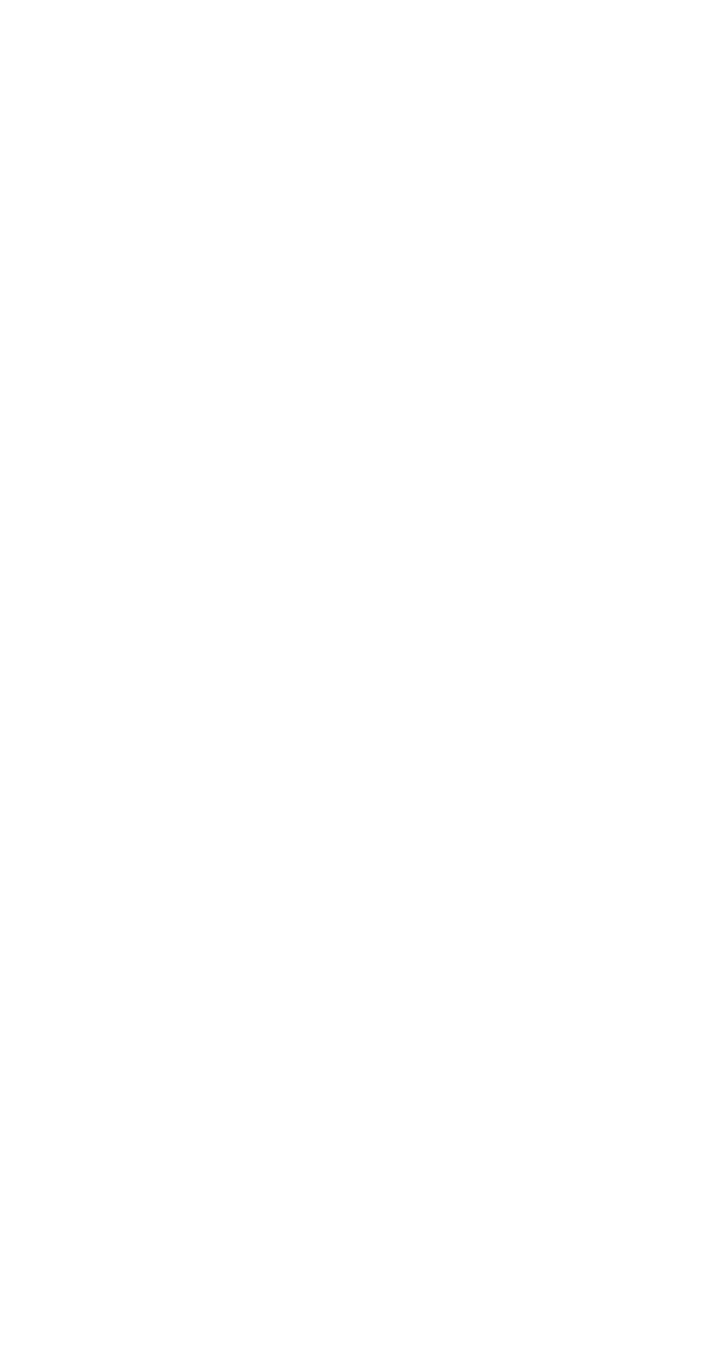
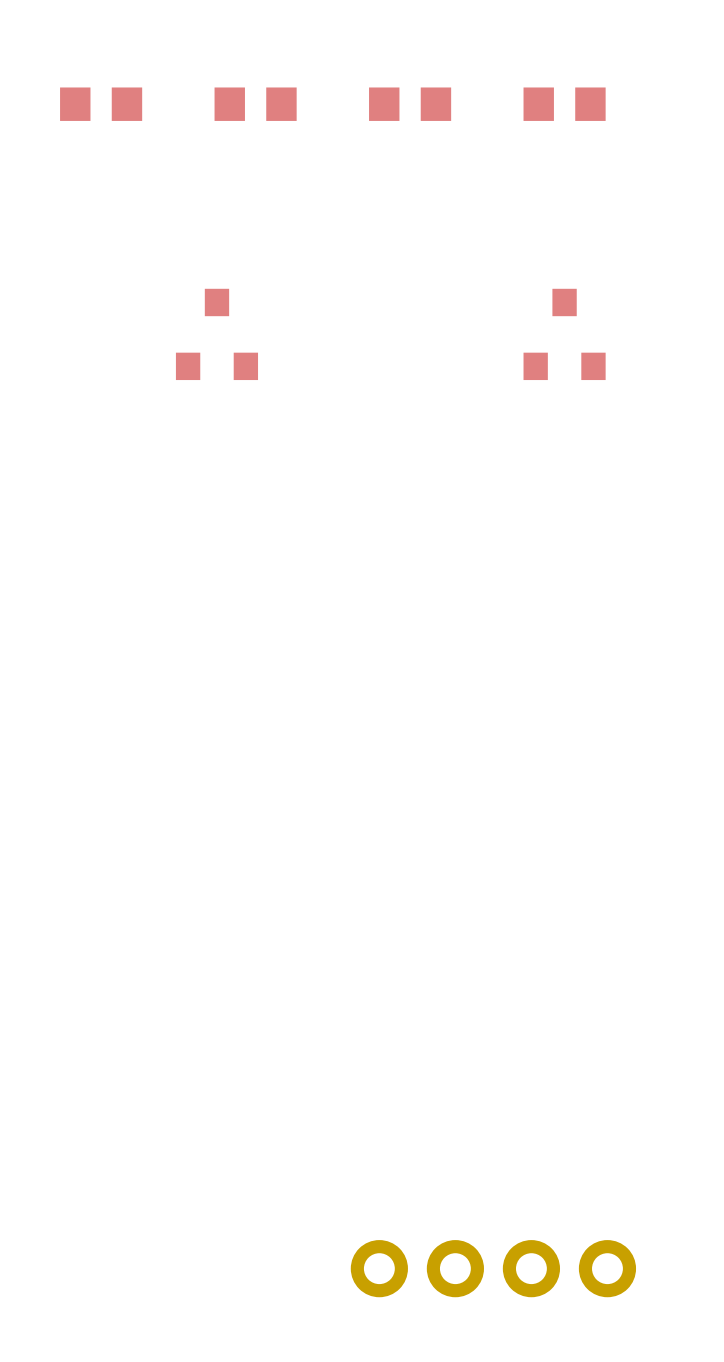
part: none -> (101, 104)
part: none -> (255, 104)
part: none -> (410, 104)
part: none -> (564, 104)
part: none -> (216, 334)
part: none -> (564, 334)
part: none -> (493, 1268)

